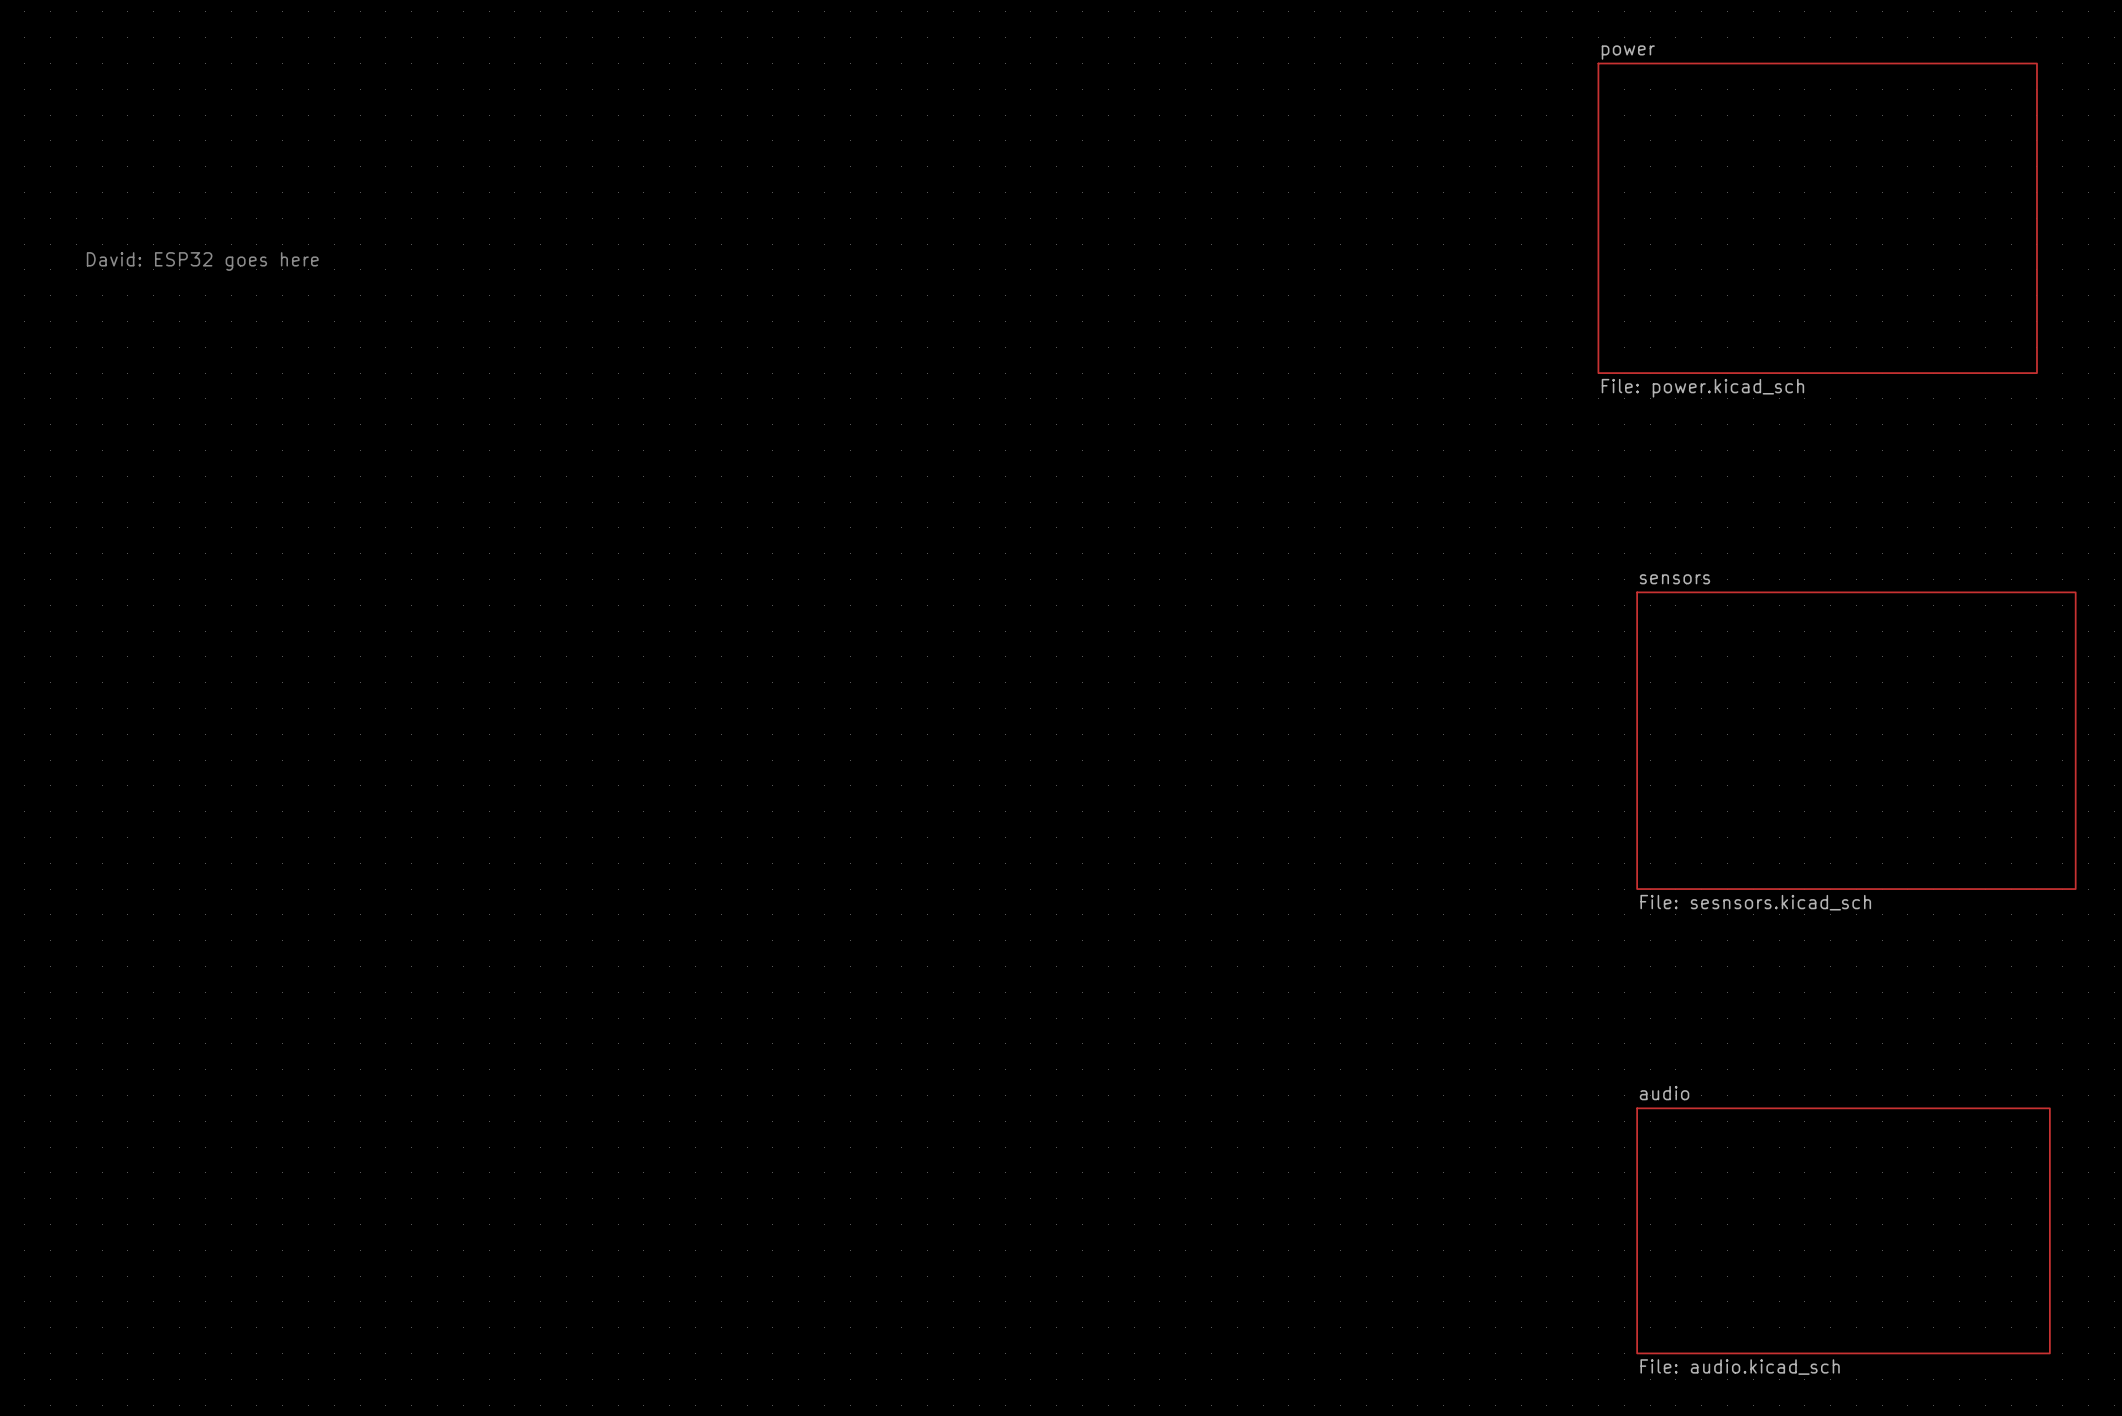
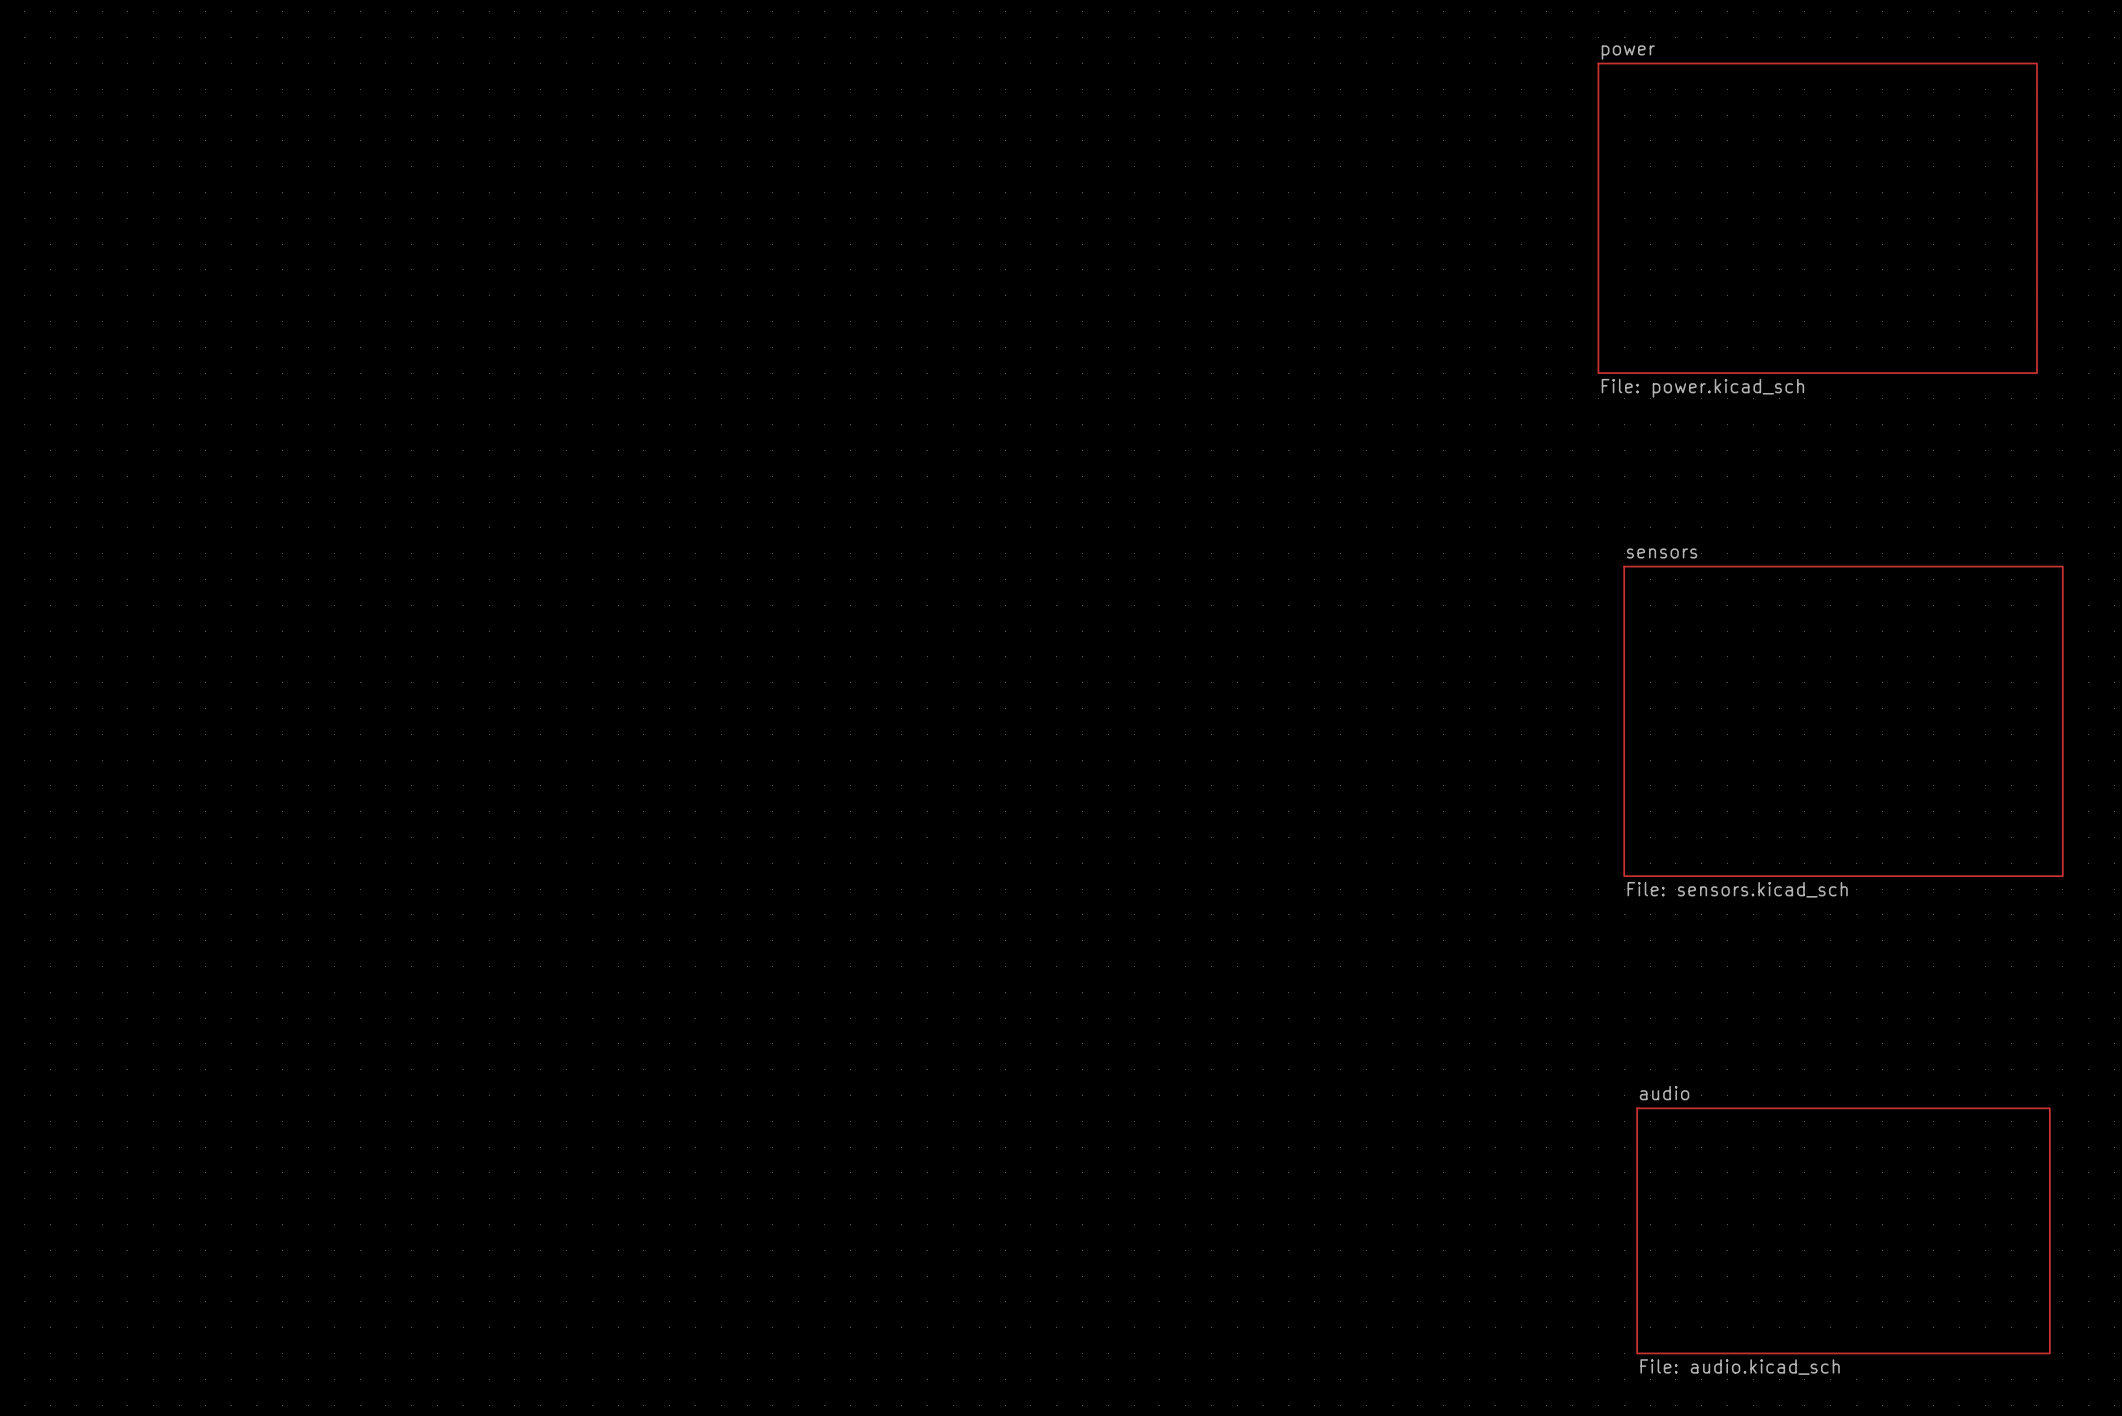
text: David: ESP32 goes here (202, 261) -> none
sheet sensors: none -> File: sensors.kicad_sch (1843, 721)
sheet sensors: File: sesnsors.kicad_sch (1856, 740) -> none

